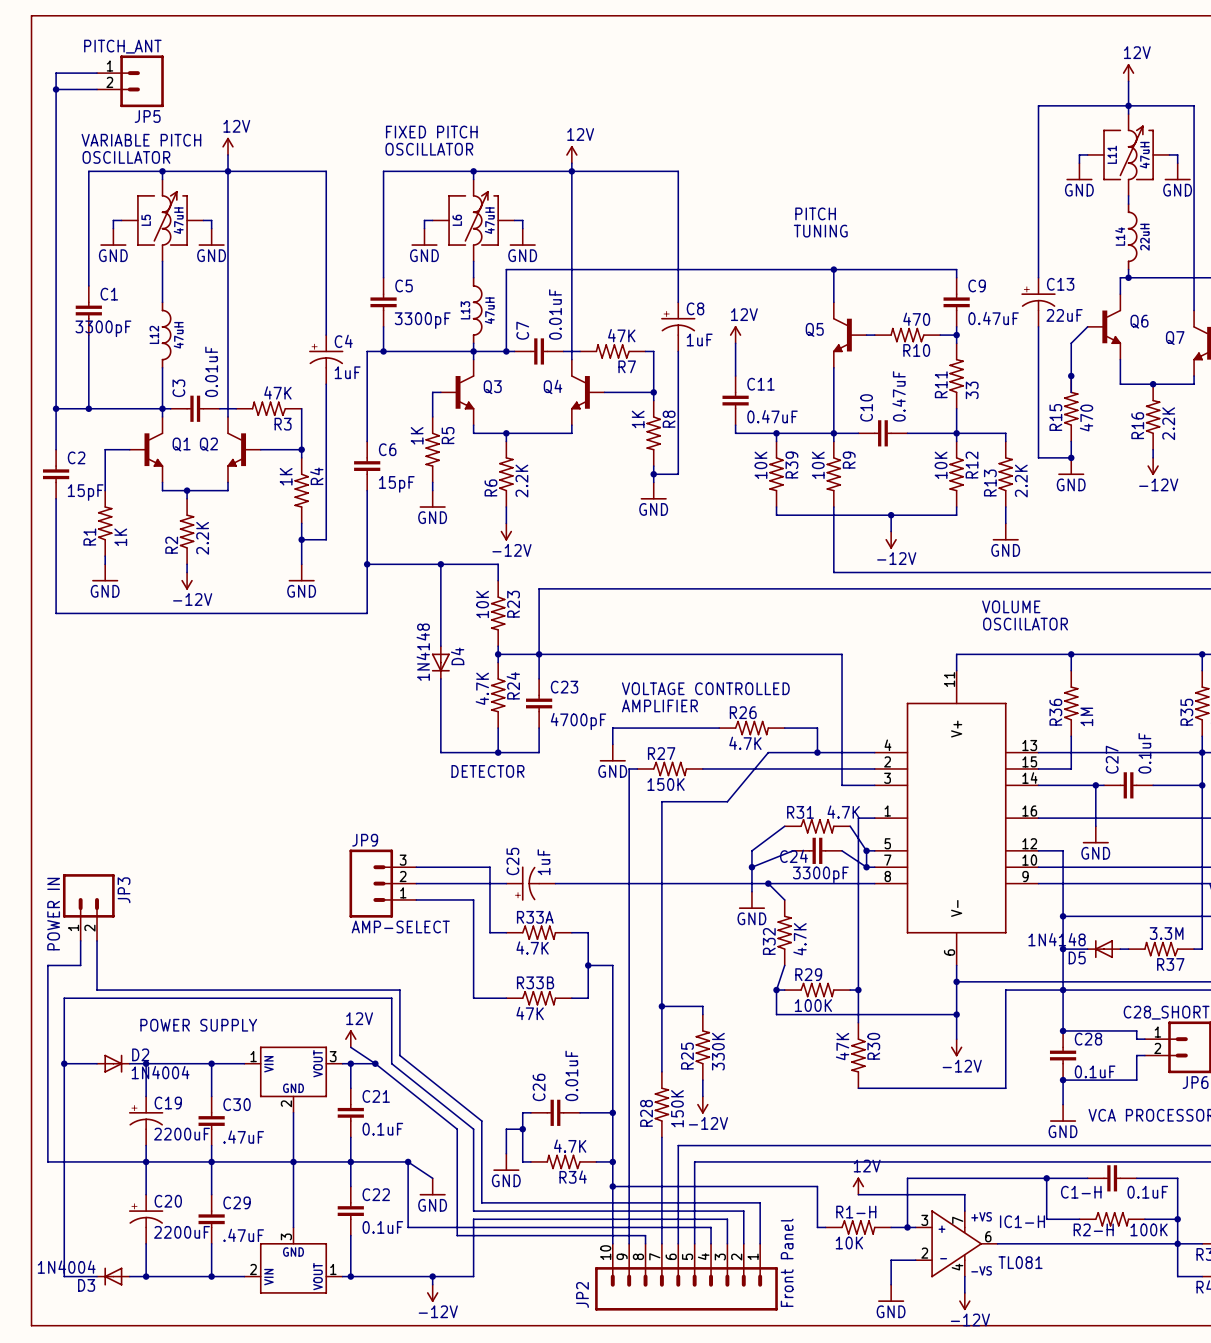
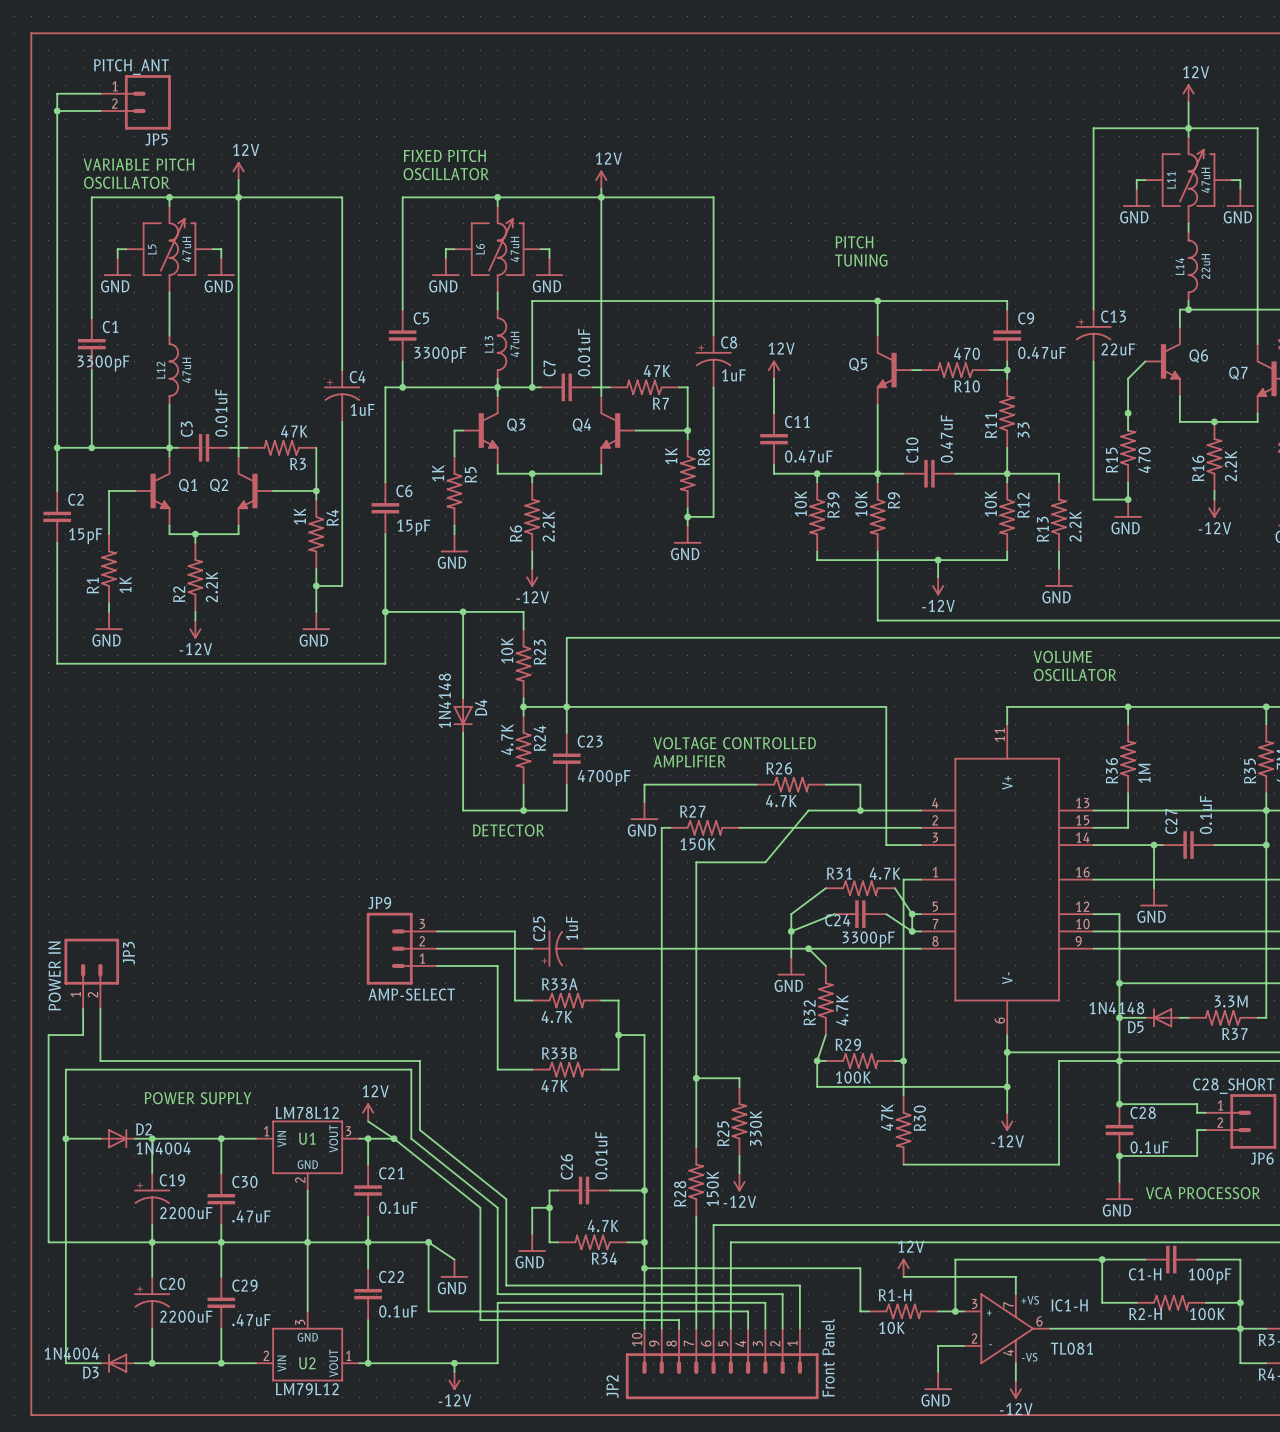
text: none -> LM78L12 (307, 1112)
text: none -> U1 (307, 1138)
C1-H value: 0.1uF (1147, 1192) -> 100pF (1210, 1276)
text: none -> U2 (307, 1363)
text: none -> LM79L12 (307, 1389)

